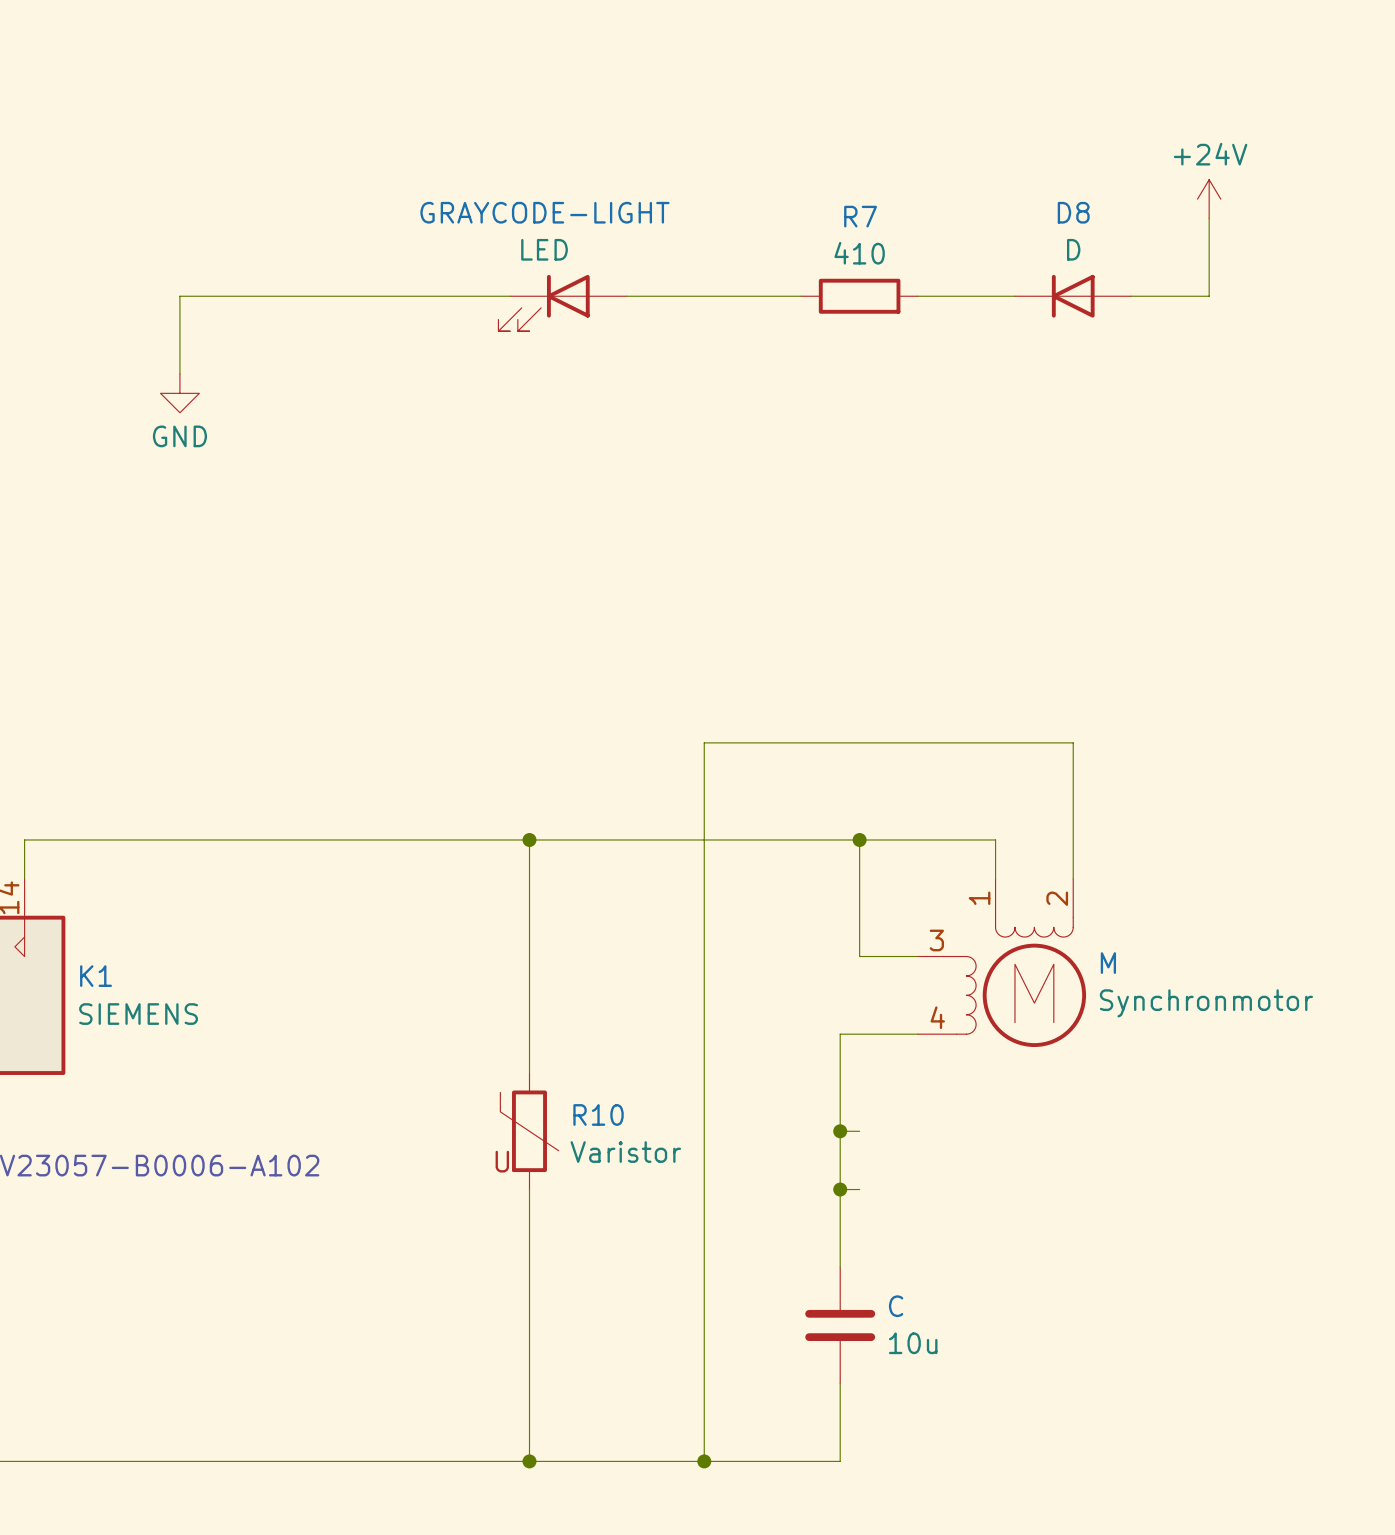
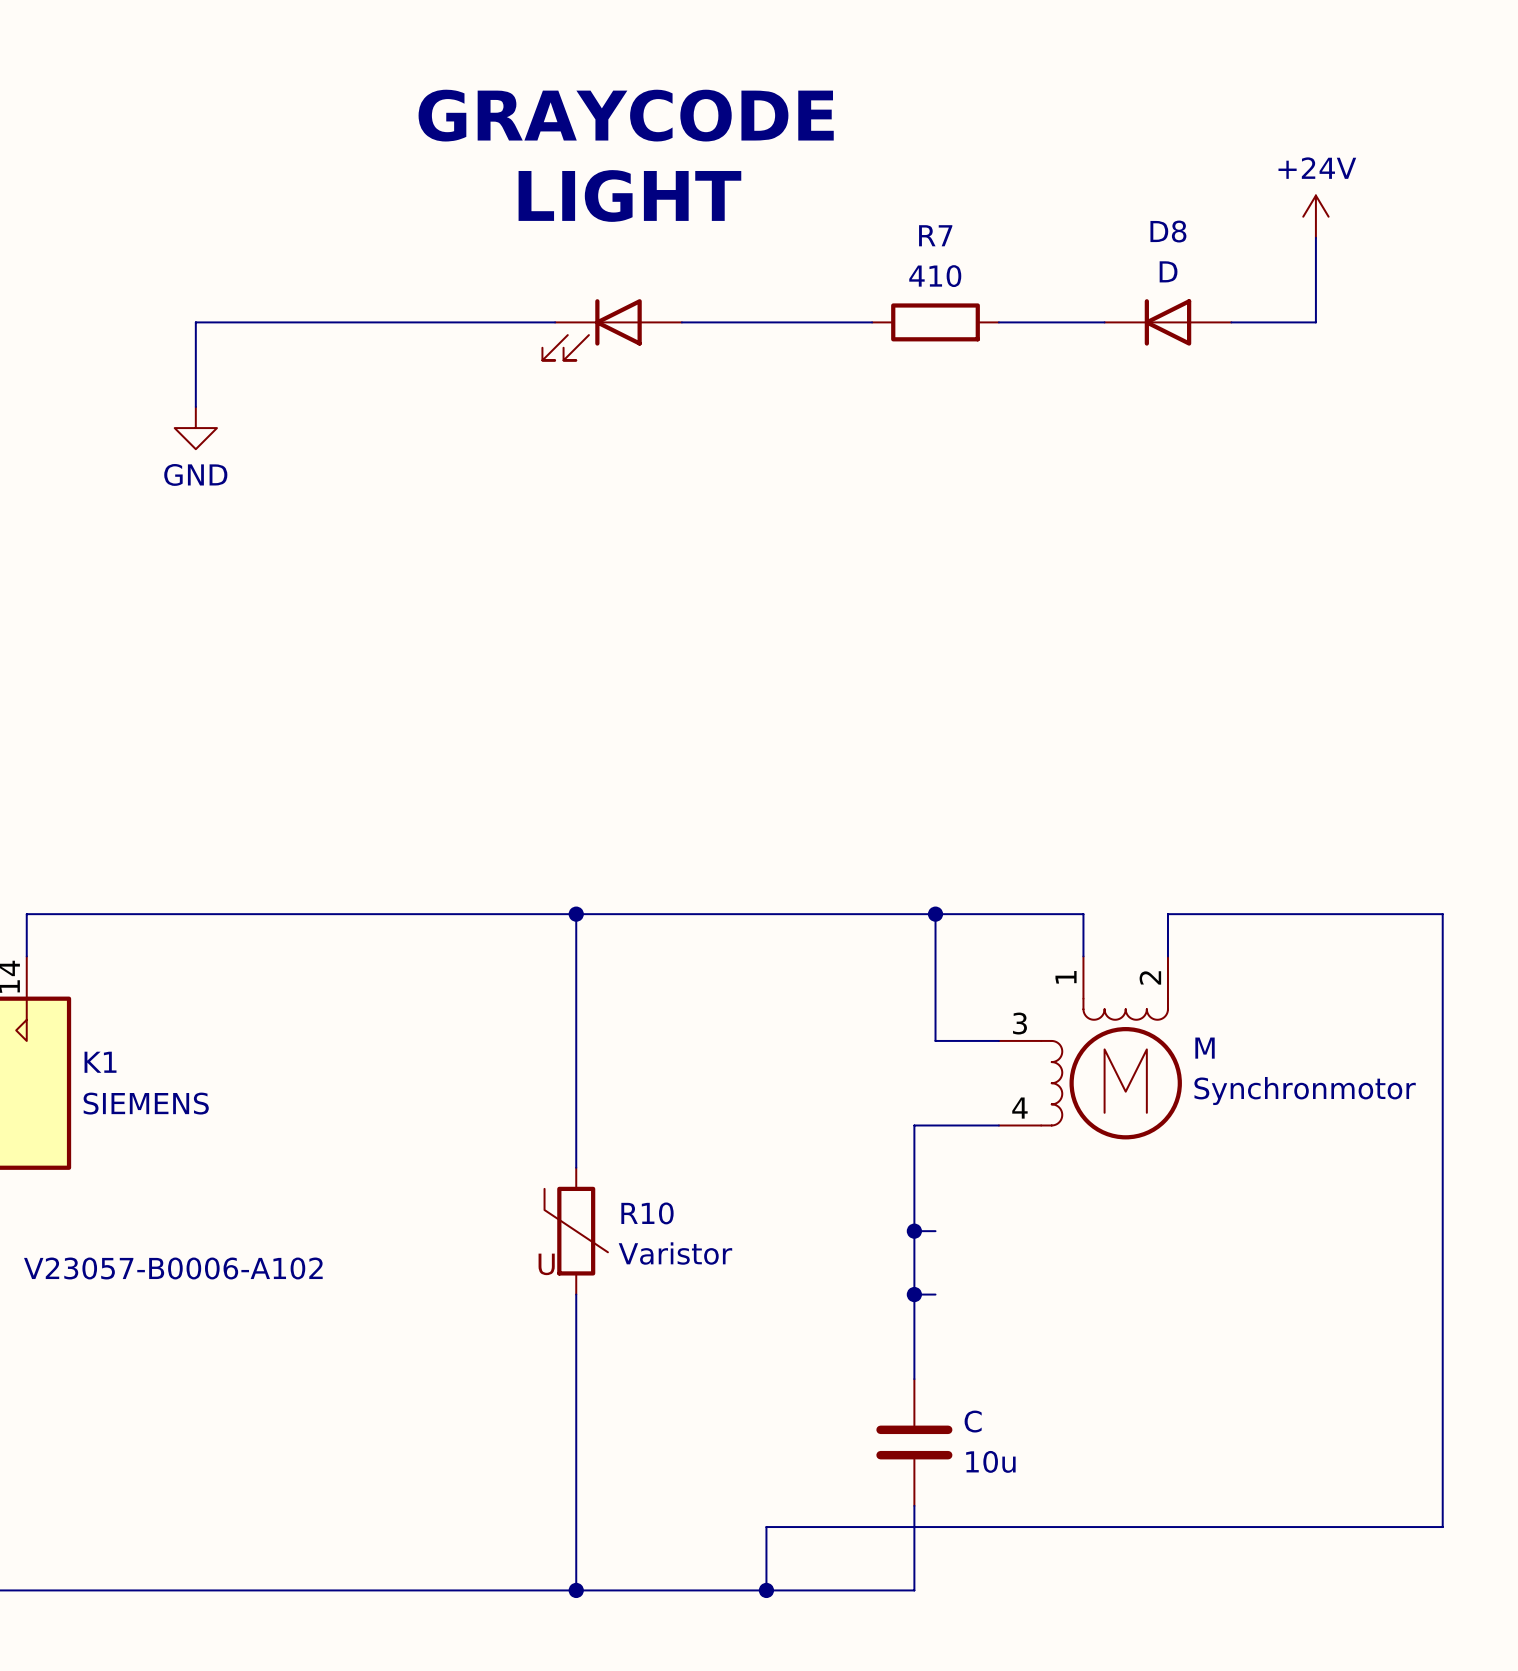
text: none -> GRAYCODE (626, 115)
text: none -> LIGHT (629, 195)
GRAYCODE-LIGHT name: GRAYCODE-LIGHT (544, 212) -> none
GRAYCODE-LIGHT value: LED (544, 249) -> none
wire: (1073, 839) (1073, 742) (704, 742) (704, 1403) -> (1167, 914) (1442, 914) (1442, 1527) (766, 1527)

